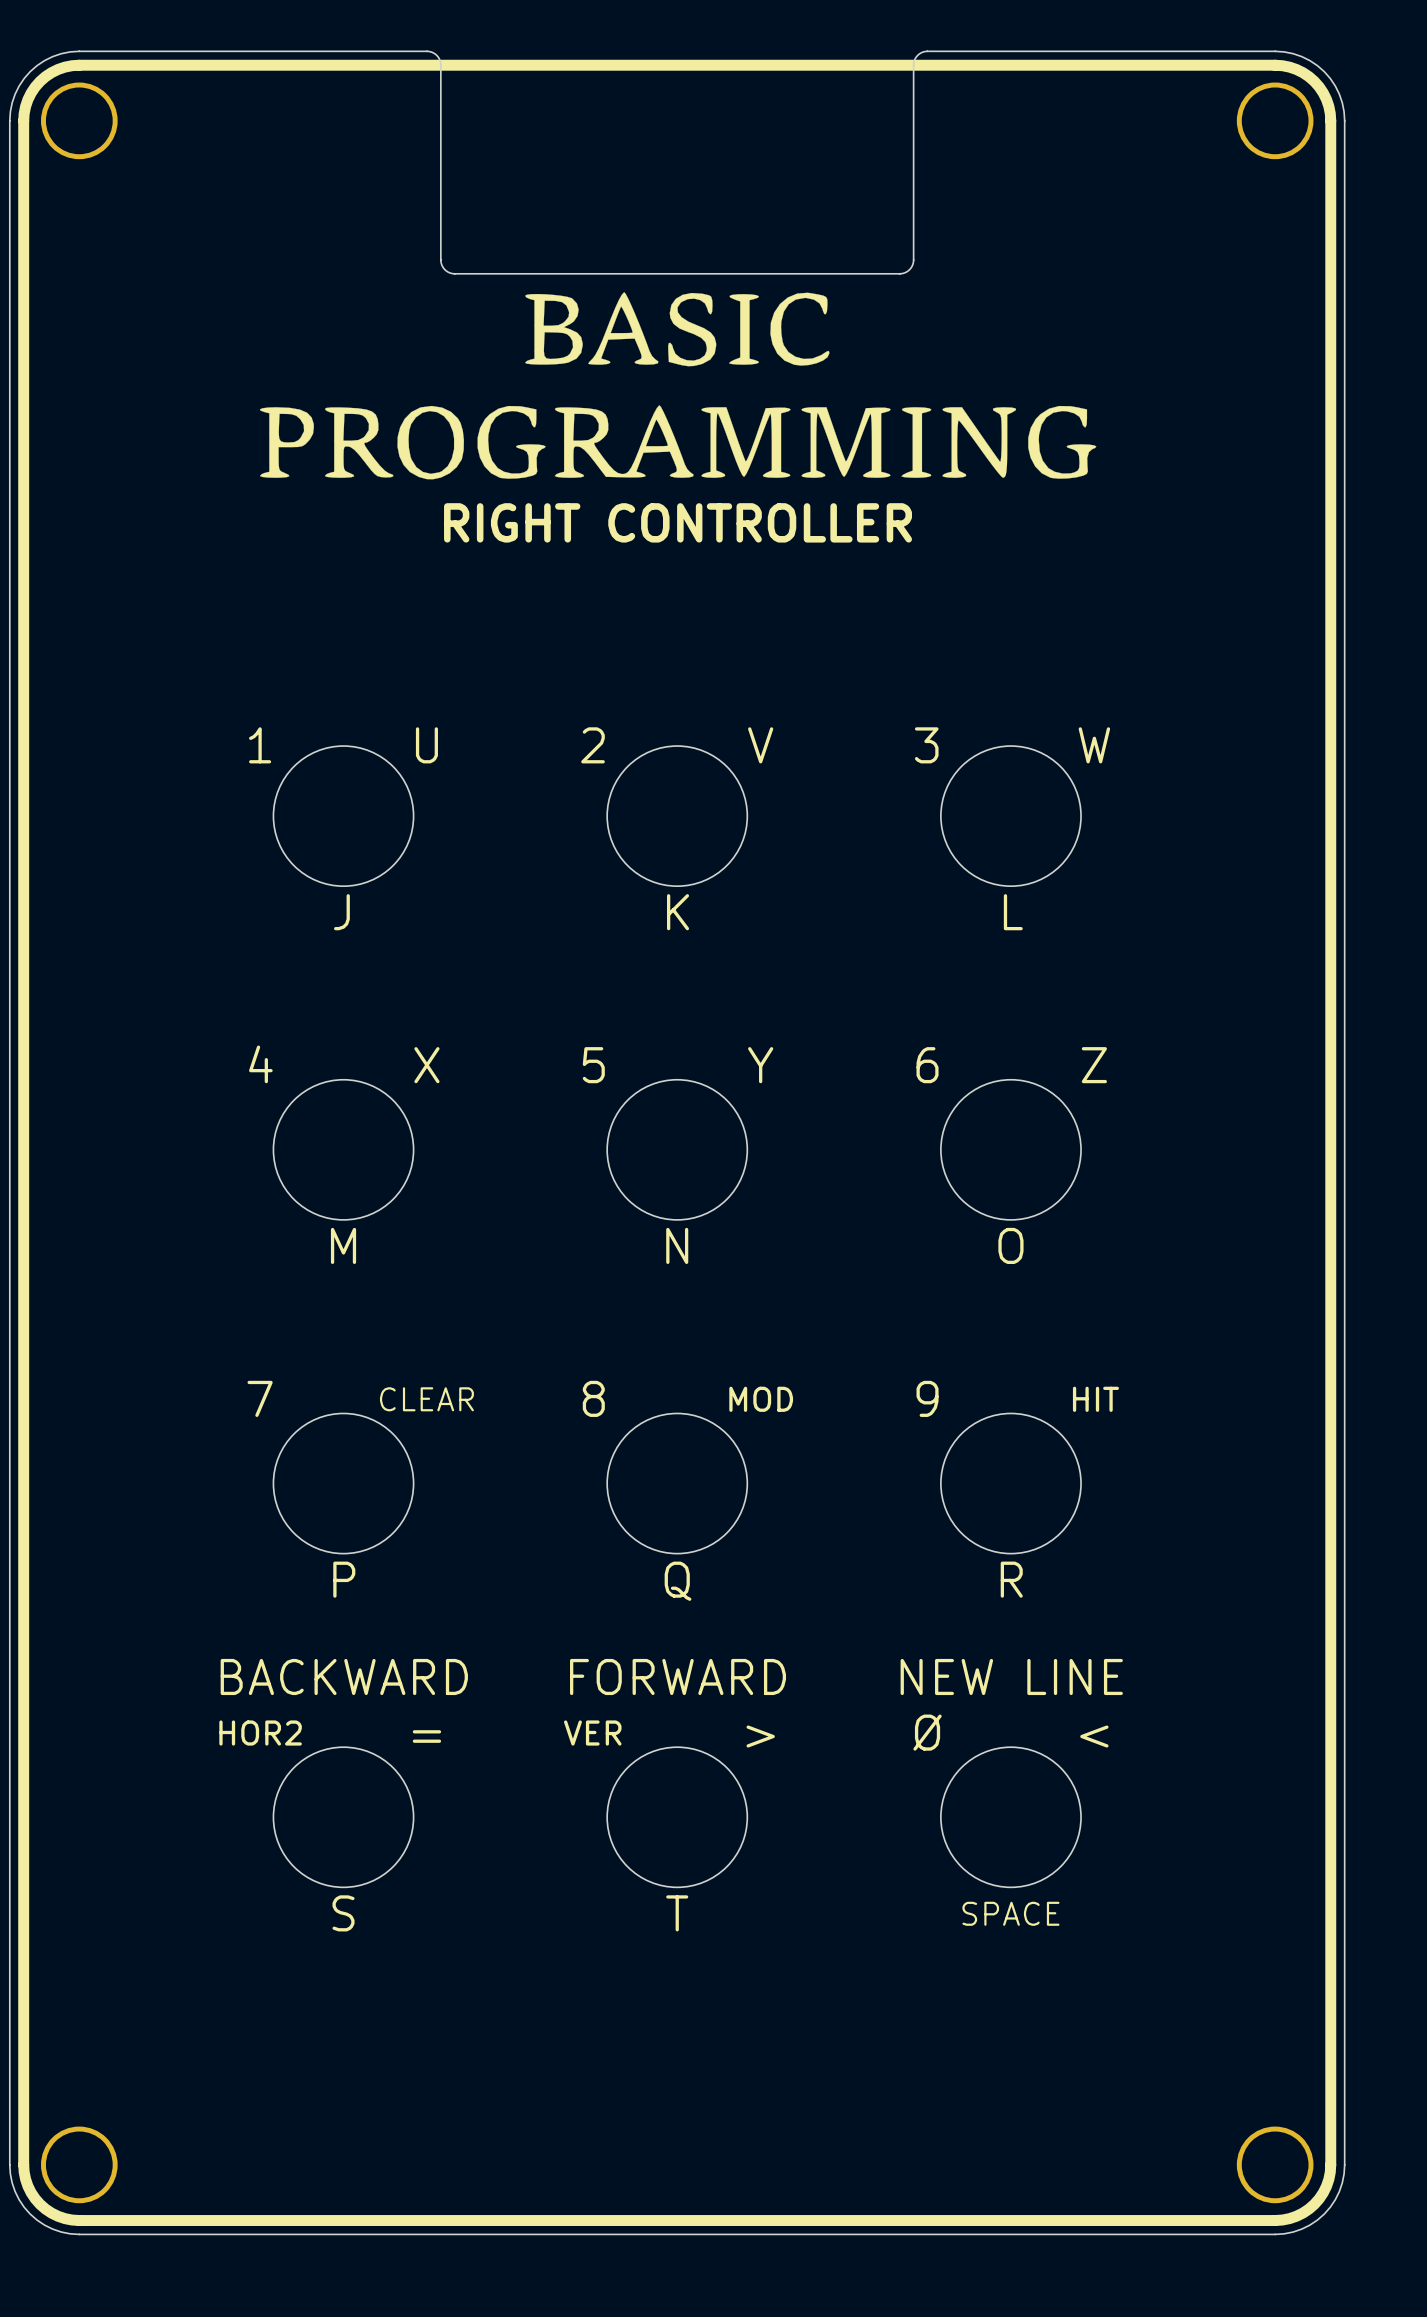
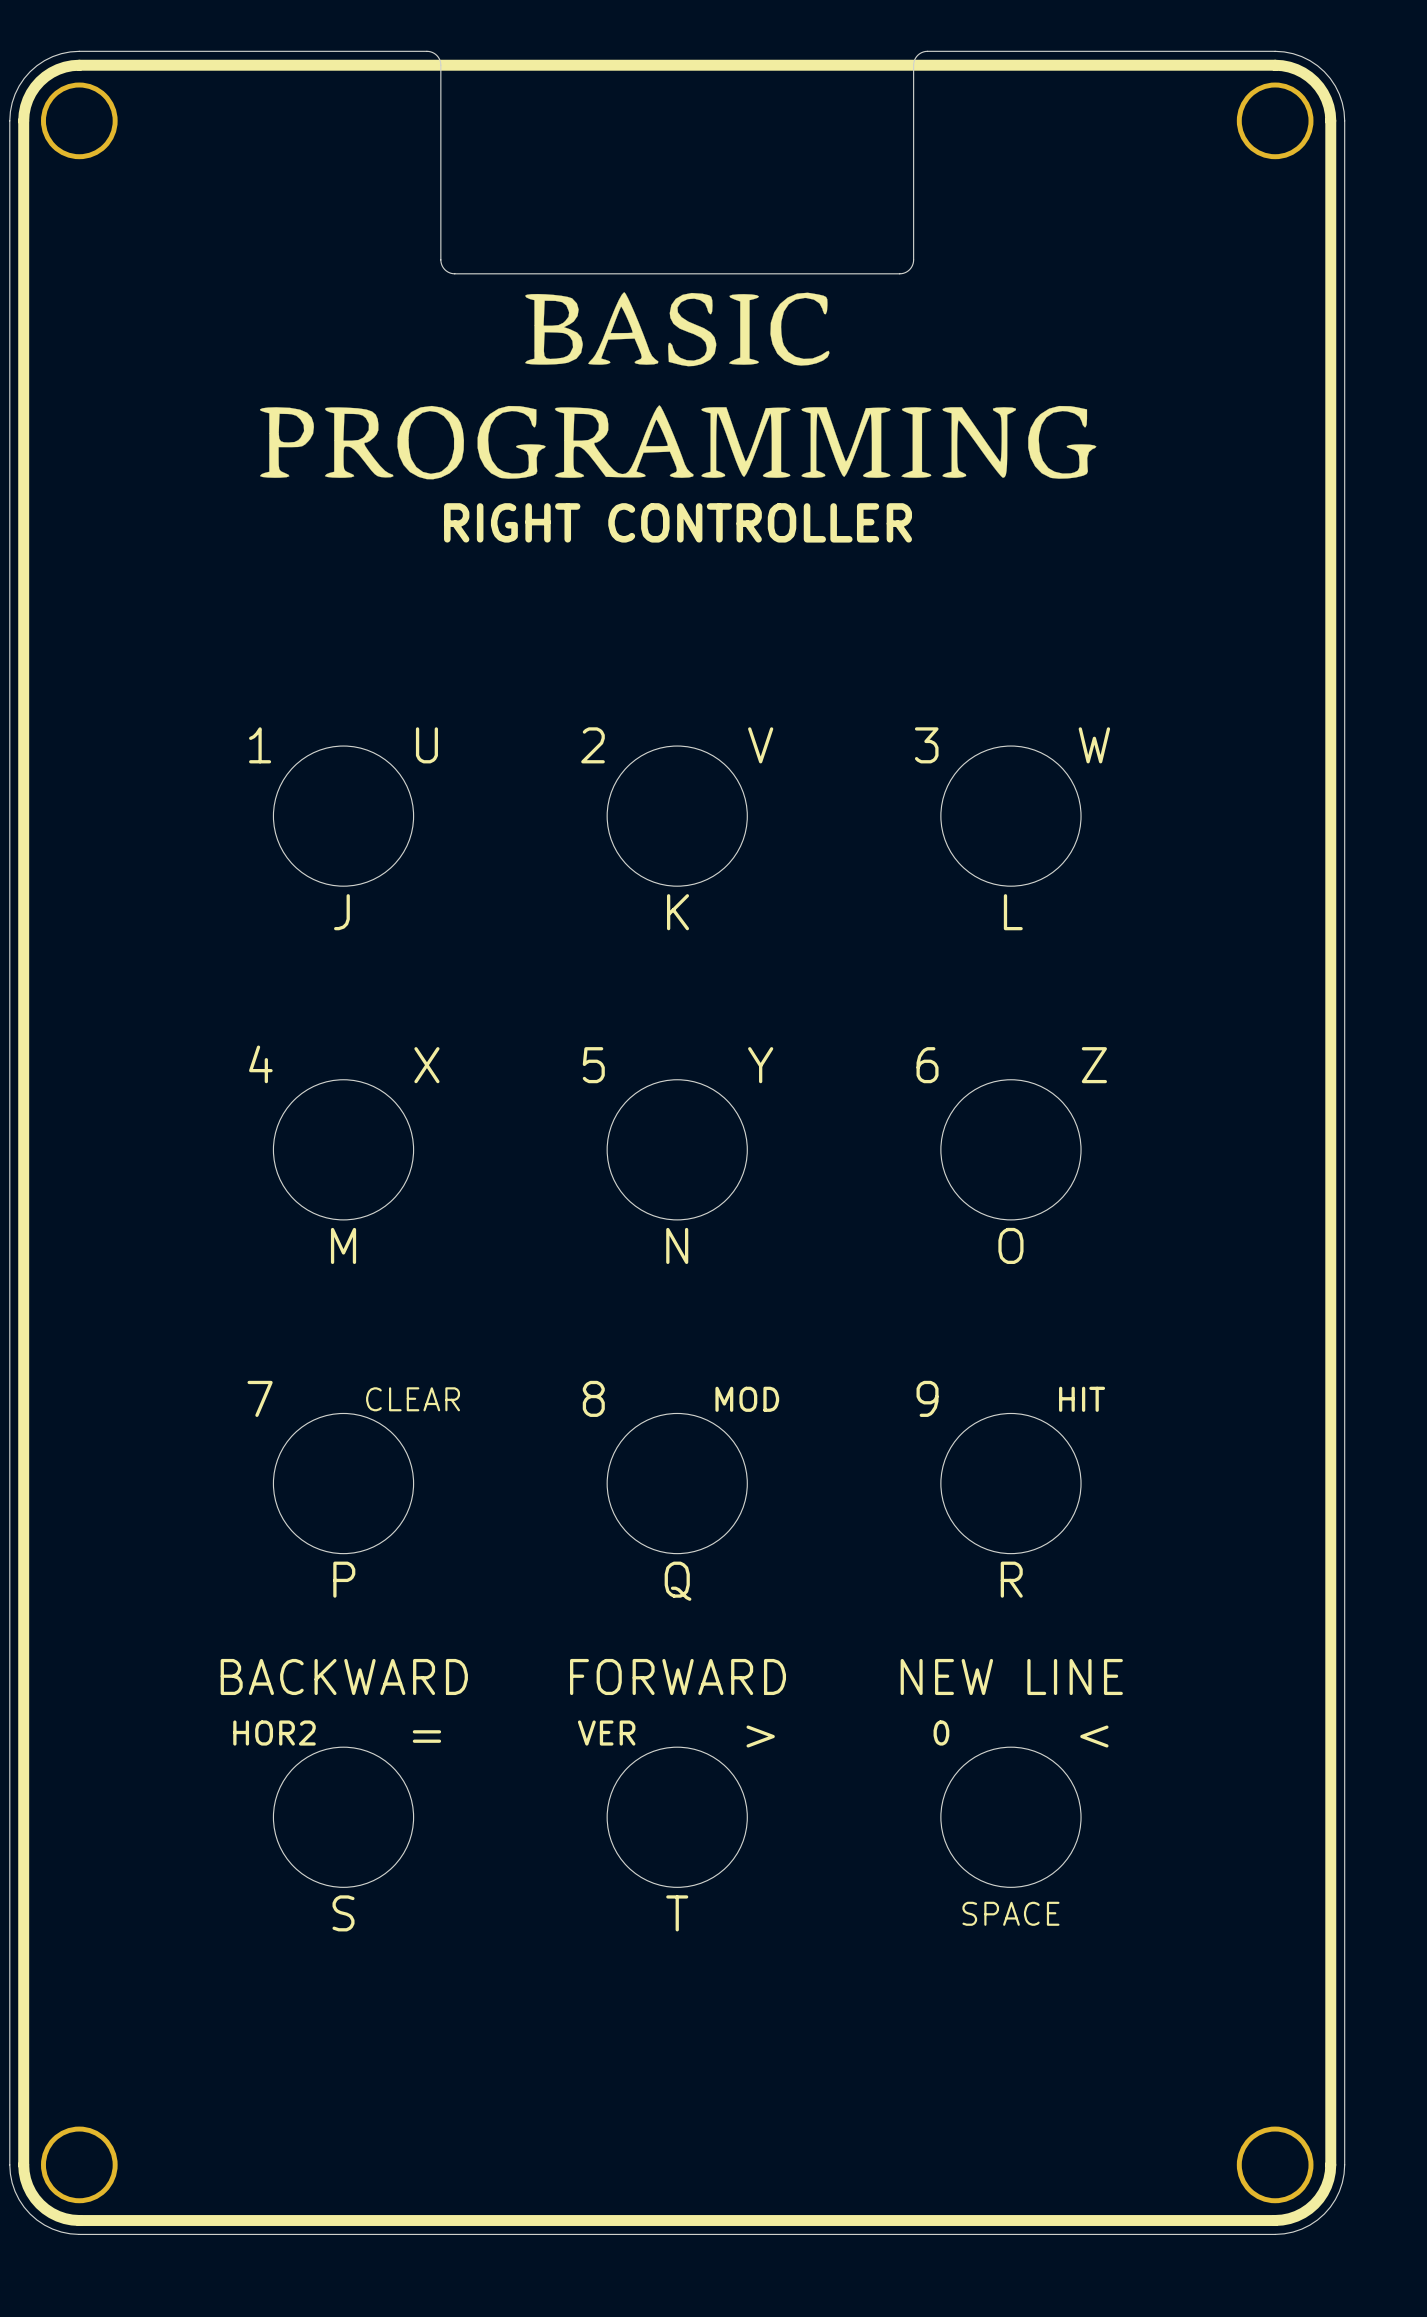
text position: CLEAR (426, 1399) -> CLEAR (413, 1399)
text position: MOD (761, 1399) -> MOD (747, 1399)
text position: HIT (1095, 1399) -> HIT (1082, 1399)
text: Ø (927, 1732) -> 0 (941, 1733)
text position: HOR2 (260, 1733) -> HOR2 (274, 1733)
text position: VER (592, 1733) -> VER (606, 1733)

